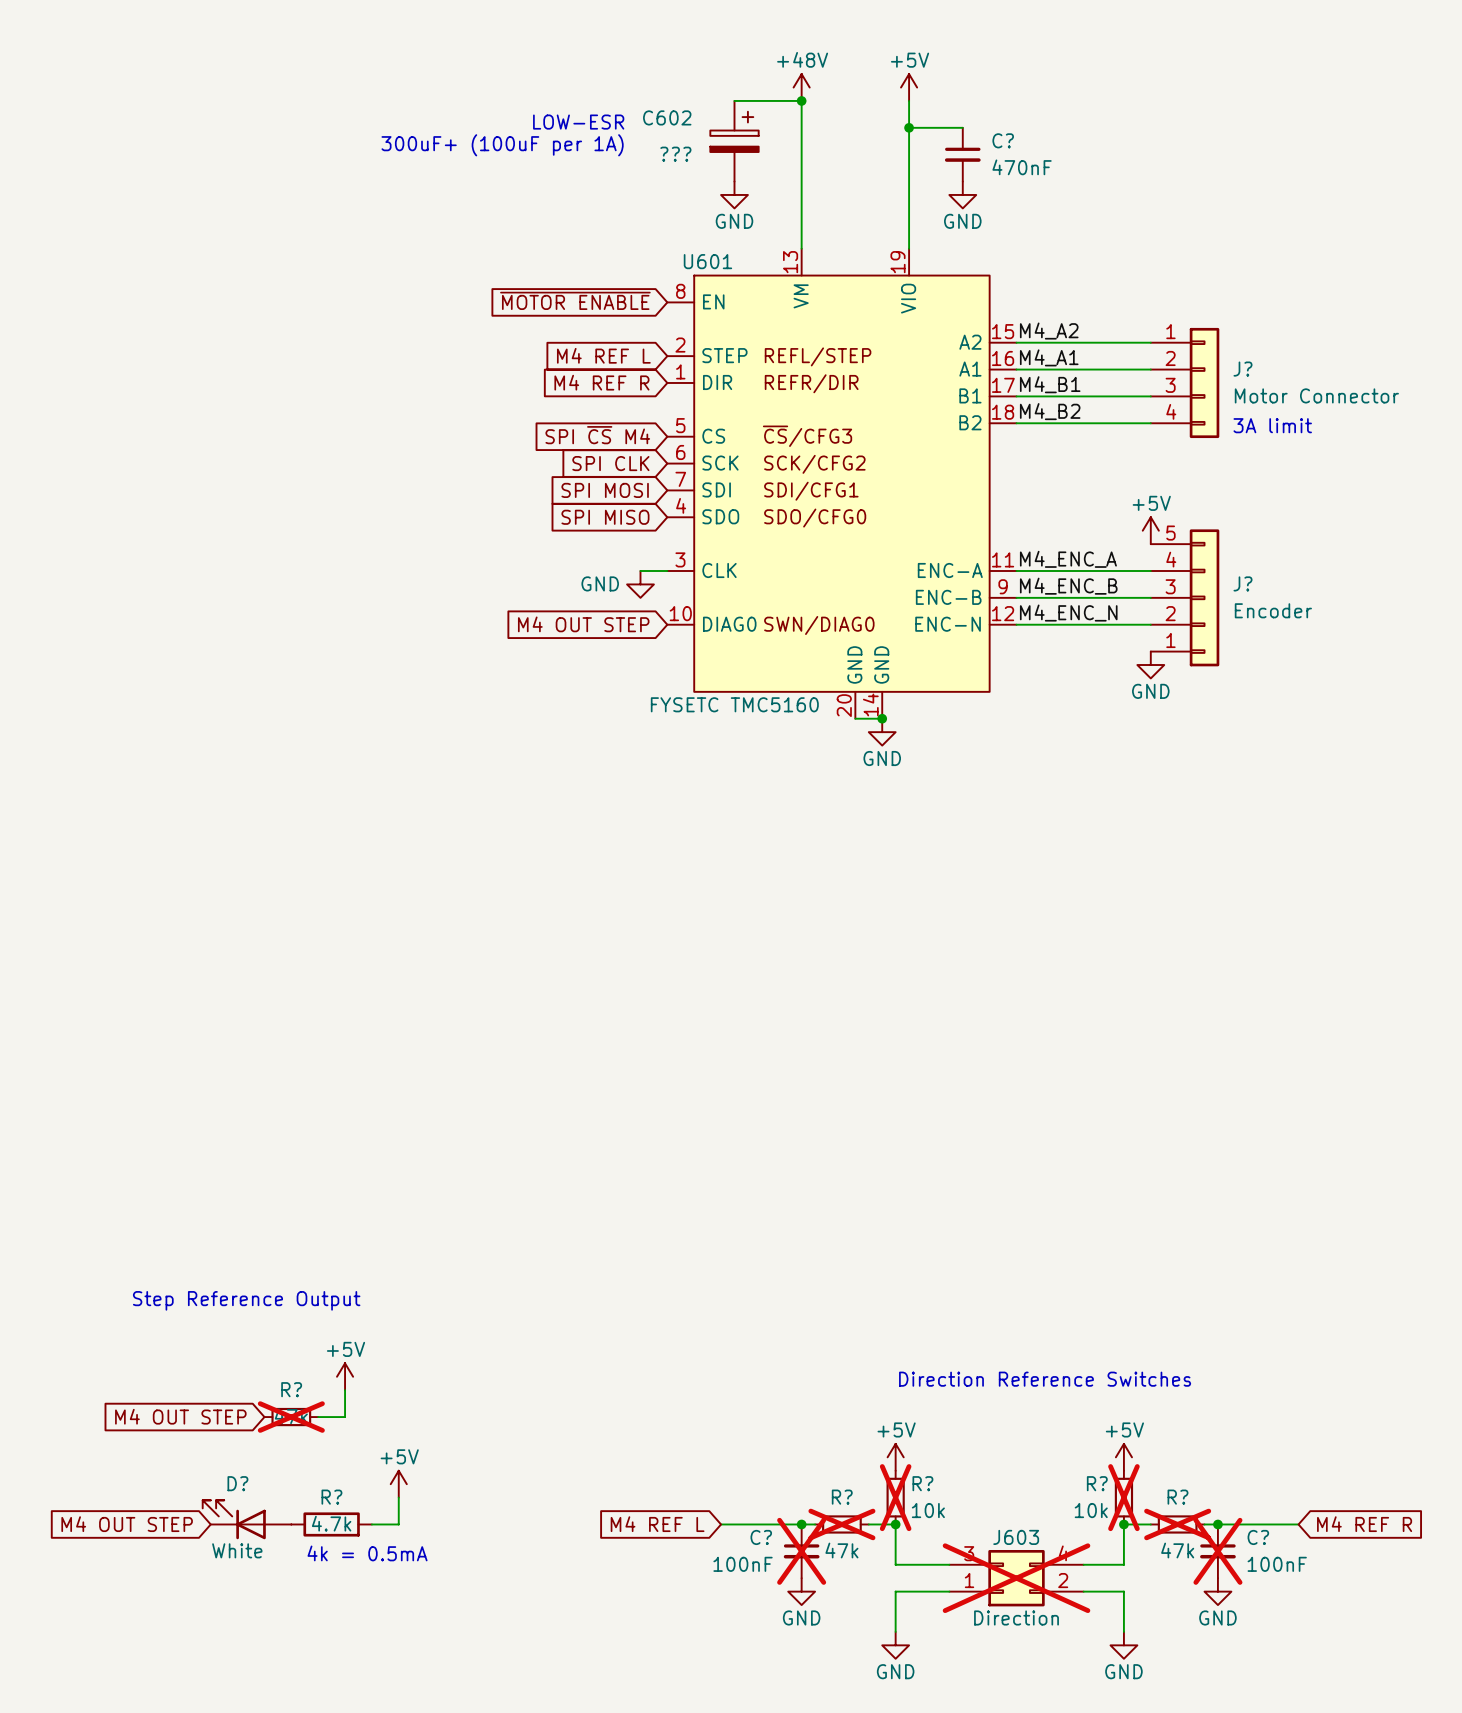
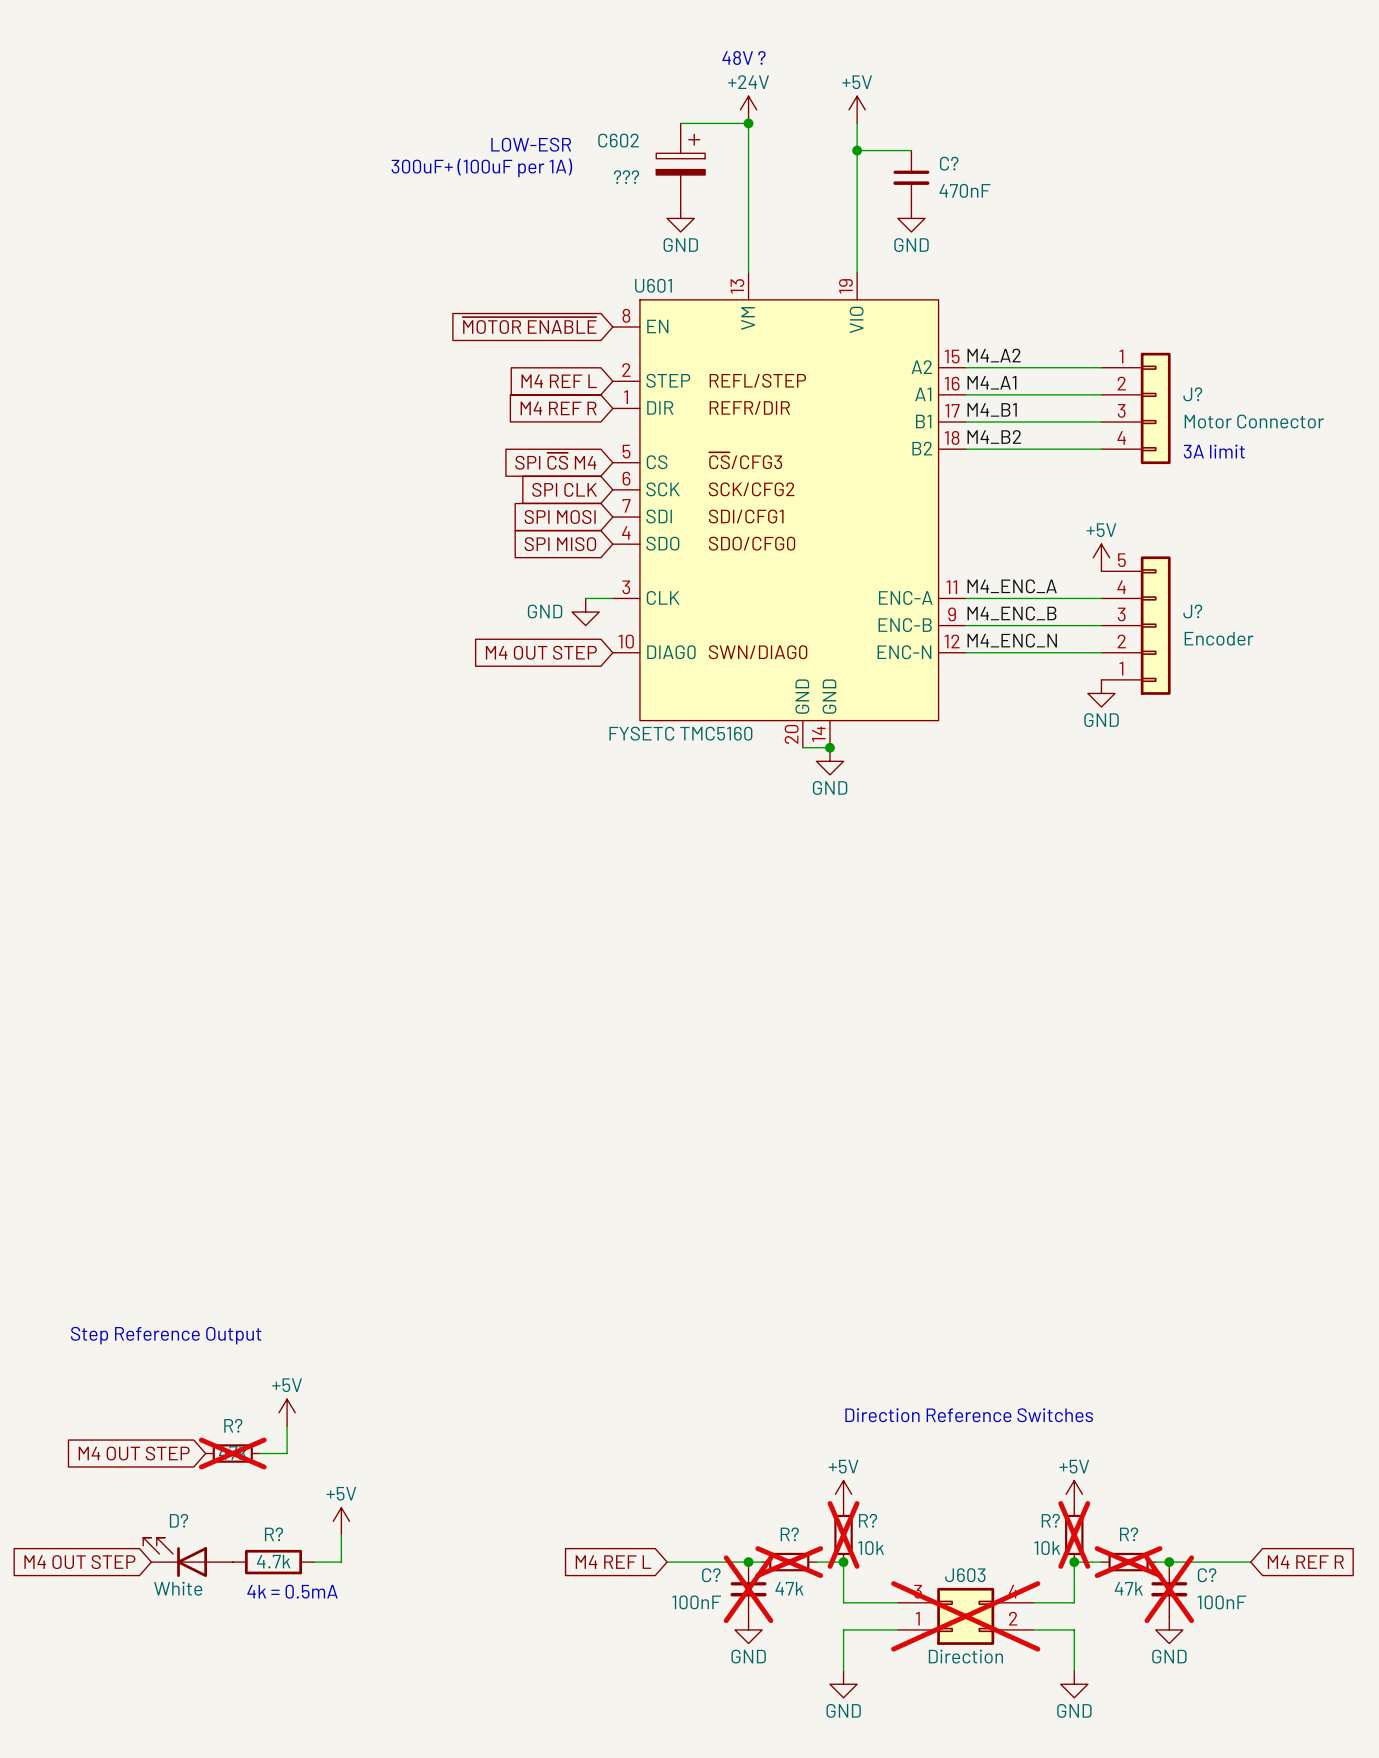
text: none -> 48V ? (743, 57)
power symbol: +48V (801, 87) -> +24V (748, 109)

